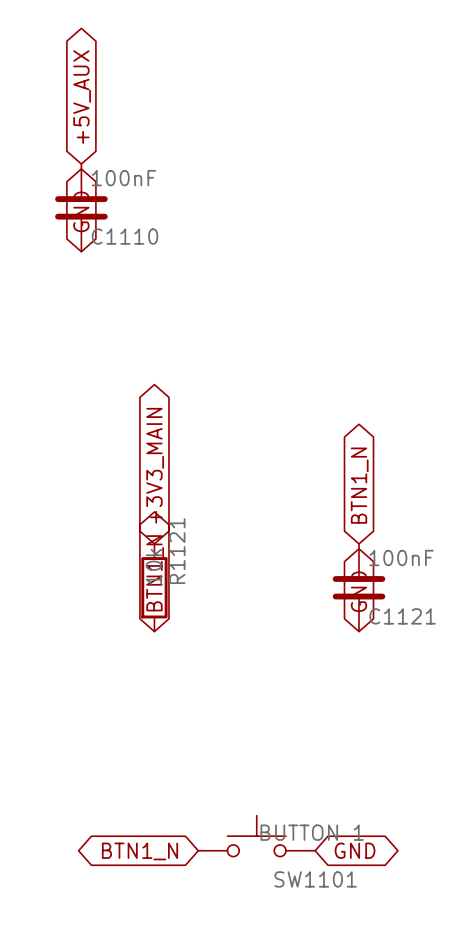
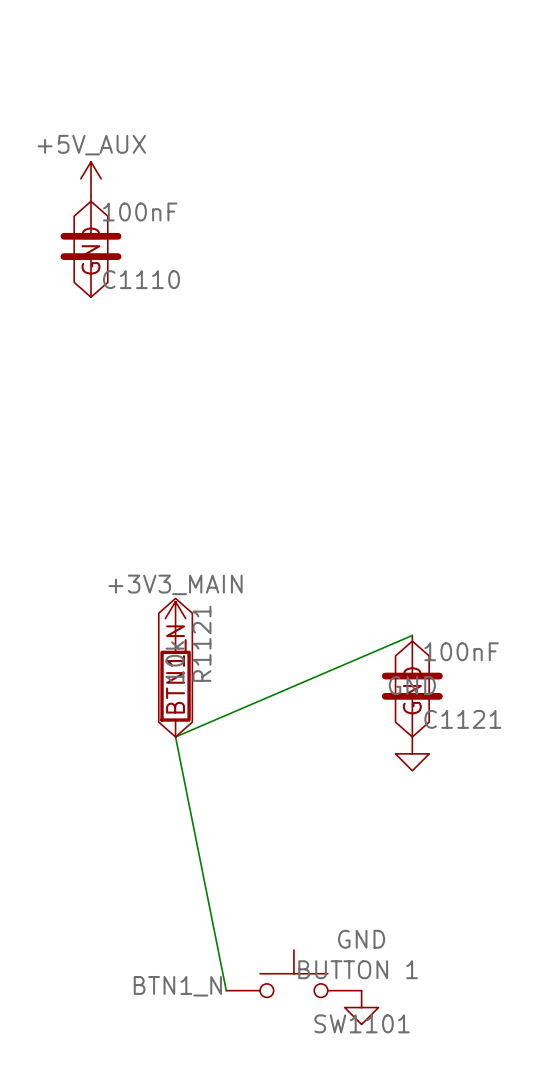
global label: +5V_AUX (82, 97) -> none
power symbol: none -> +5V_AUX (90, 178)
global label: +3V3_MAIN (155, 465) -> none
global label: BTN1_N (359, 485) -> none
power symbol: none -> +3V3_MAIN (175, 618)
wire: none -> (412, 635) (175, 736) (226, 990)
power symbol: none -> GND (412, 753)
label: none -> BTN1_N (177, 986)
global label: GND (355, 850) -> none
global label: BTN1_N (139, 851) -> none
power symbol: none -> GND (361, 1007)

